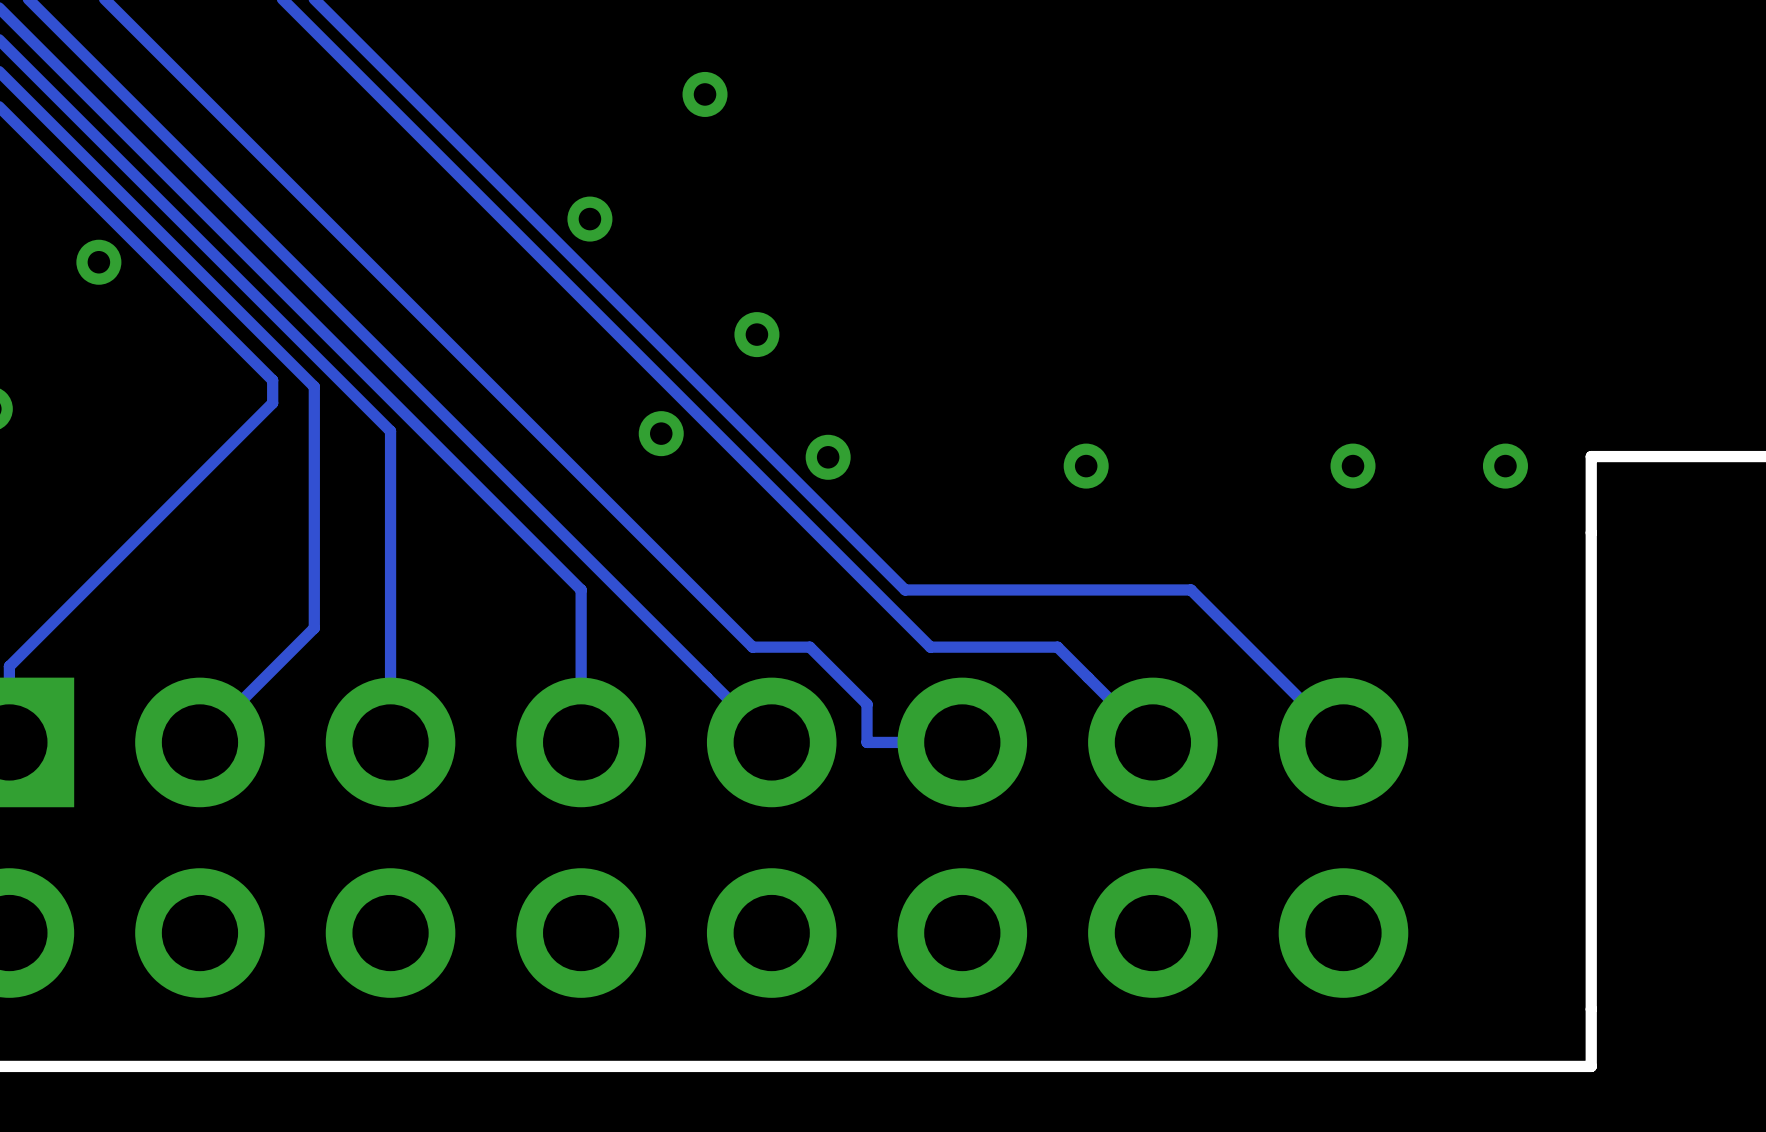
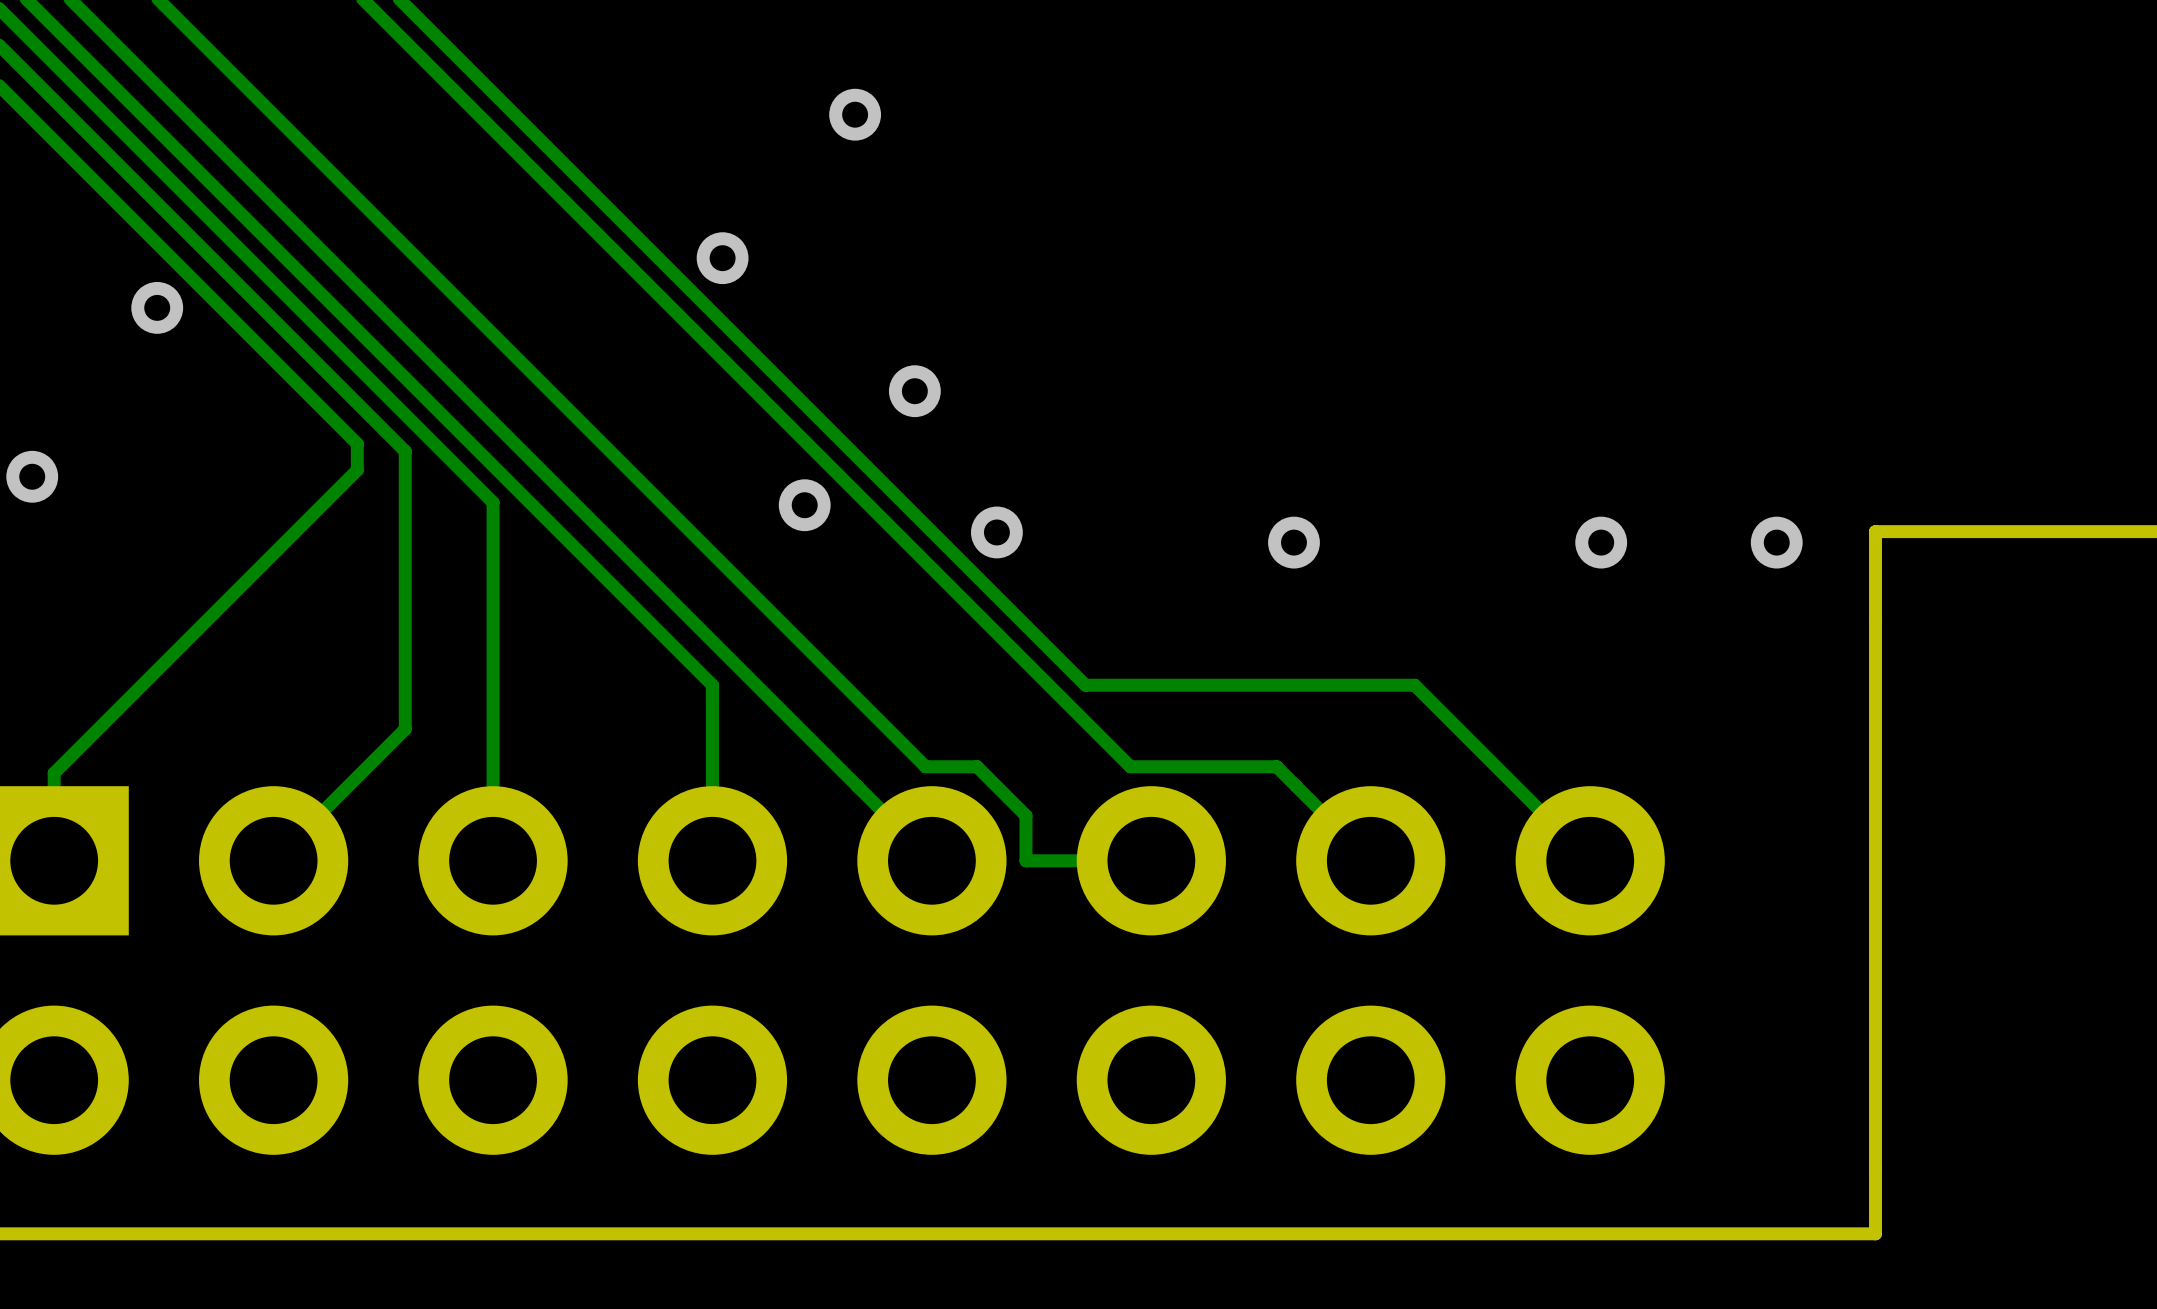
track: (752, 647) (809, 647) (867, 704) (867, 742) -> (909, 751) (925, 766) (977, 766) (1025, 815) (1025, 860) (1041, 860)
track: (930, 647) (1057, 647) (1071, 660) -> (1114, 751) (1130, 766) (1276, 766)

